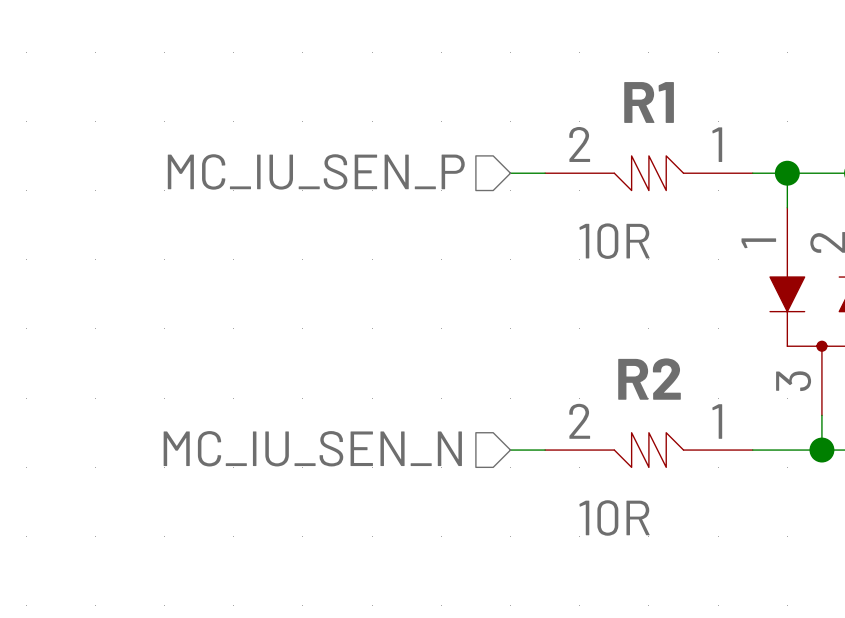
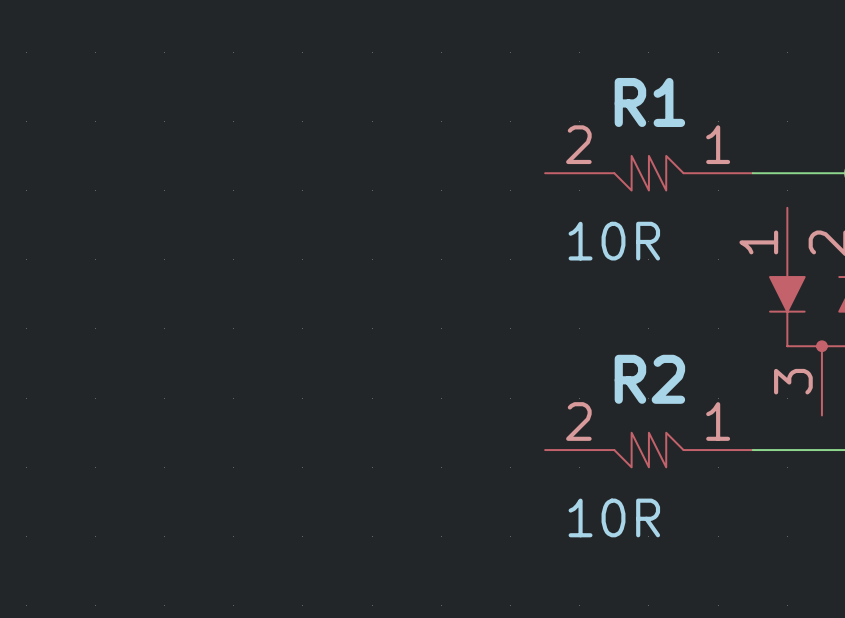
hierarchical label: MC_IU_SEN_P (316, 171) -> none
wire: (510, 173) (545, 173) -> none
wire: (787, 173) (787, 207) -> none
junction: (787, 173) -> none
wire: (821, 415) (821, 450) -> none
hierarchical label: MC_IU_SEN_N (312, 448) -> none
wire: (510, 450) (545, 450) -> none
junction: (821, 450) -> none

